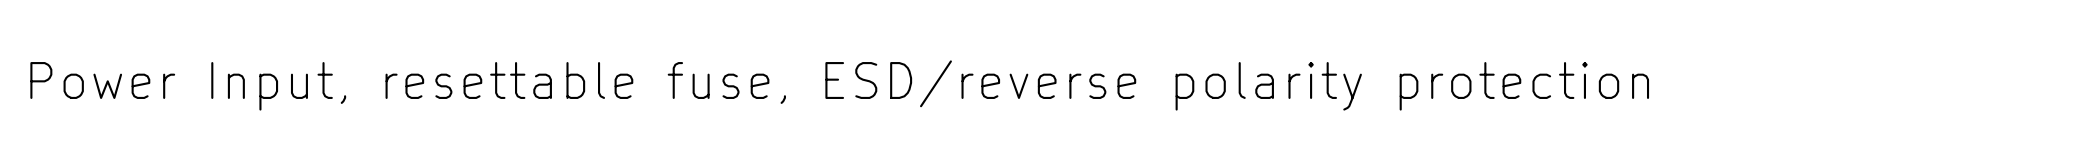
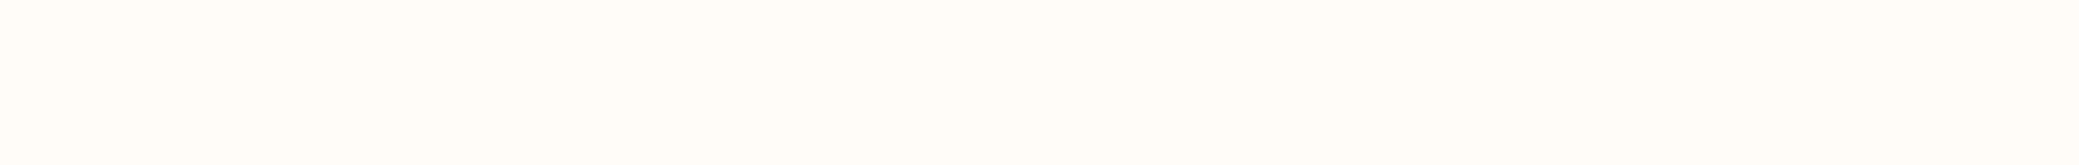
text: Power Input, resettable fuse, ESD/reverse polarity protection (839, 85) -> none

